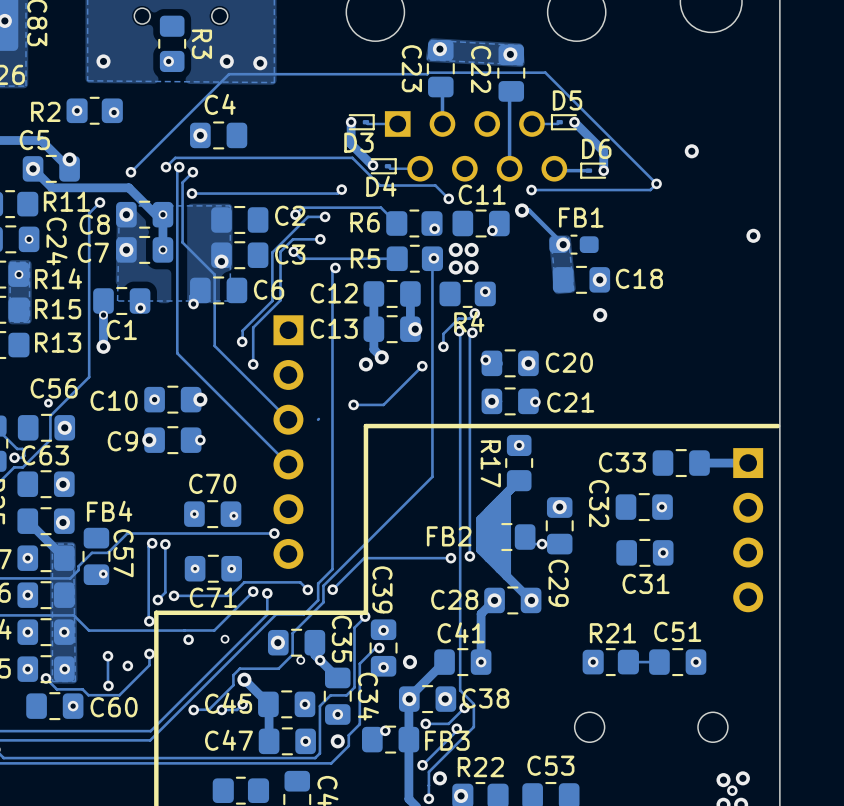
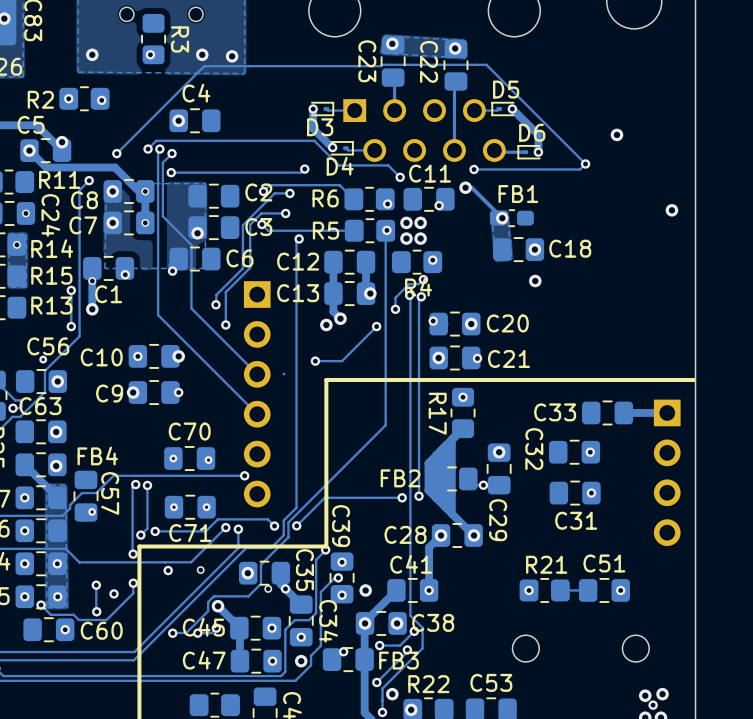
track: none -> (71, 290) (71, 326)
via: none -> (71, 290)
via: none -> (71, 326)

